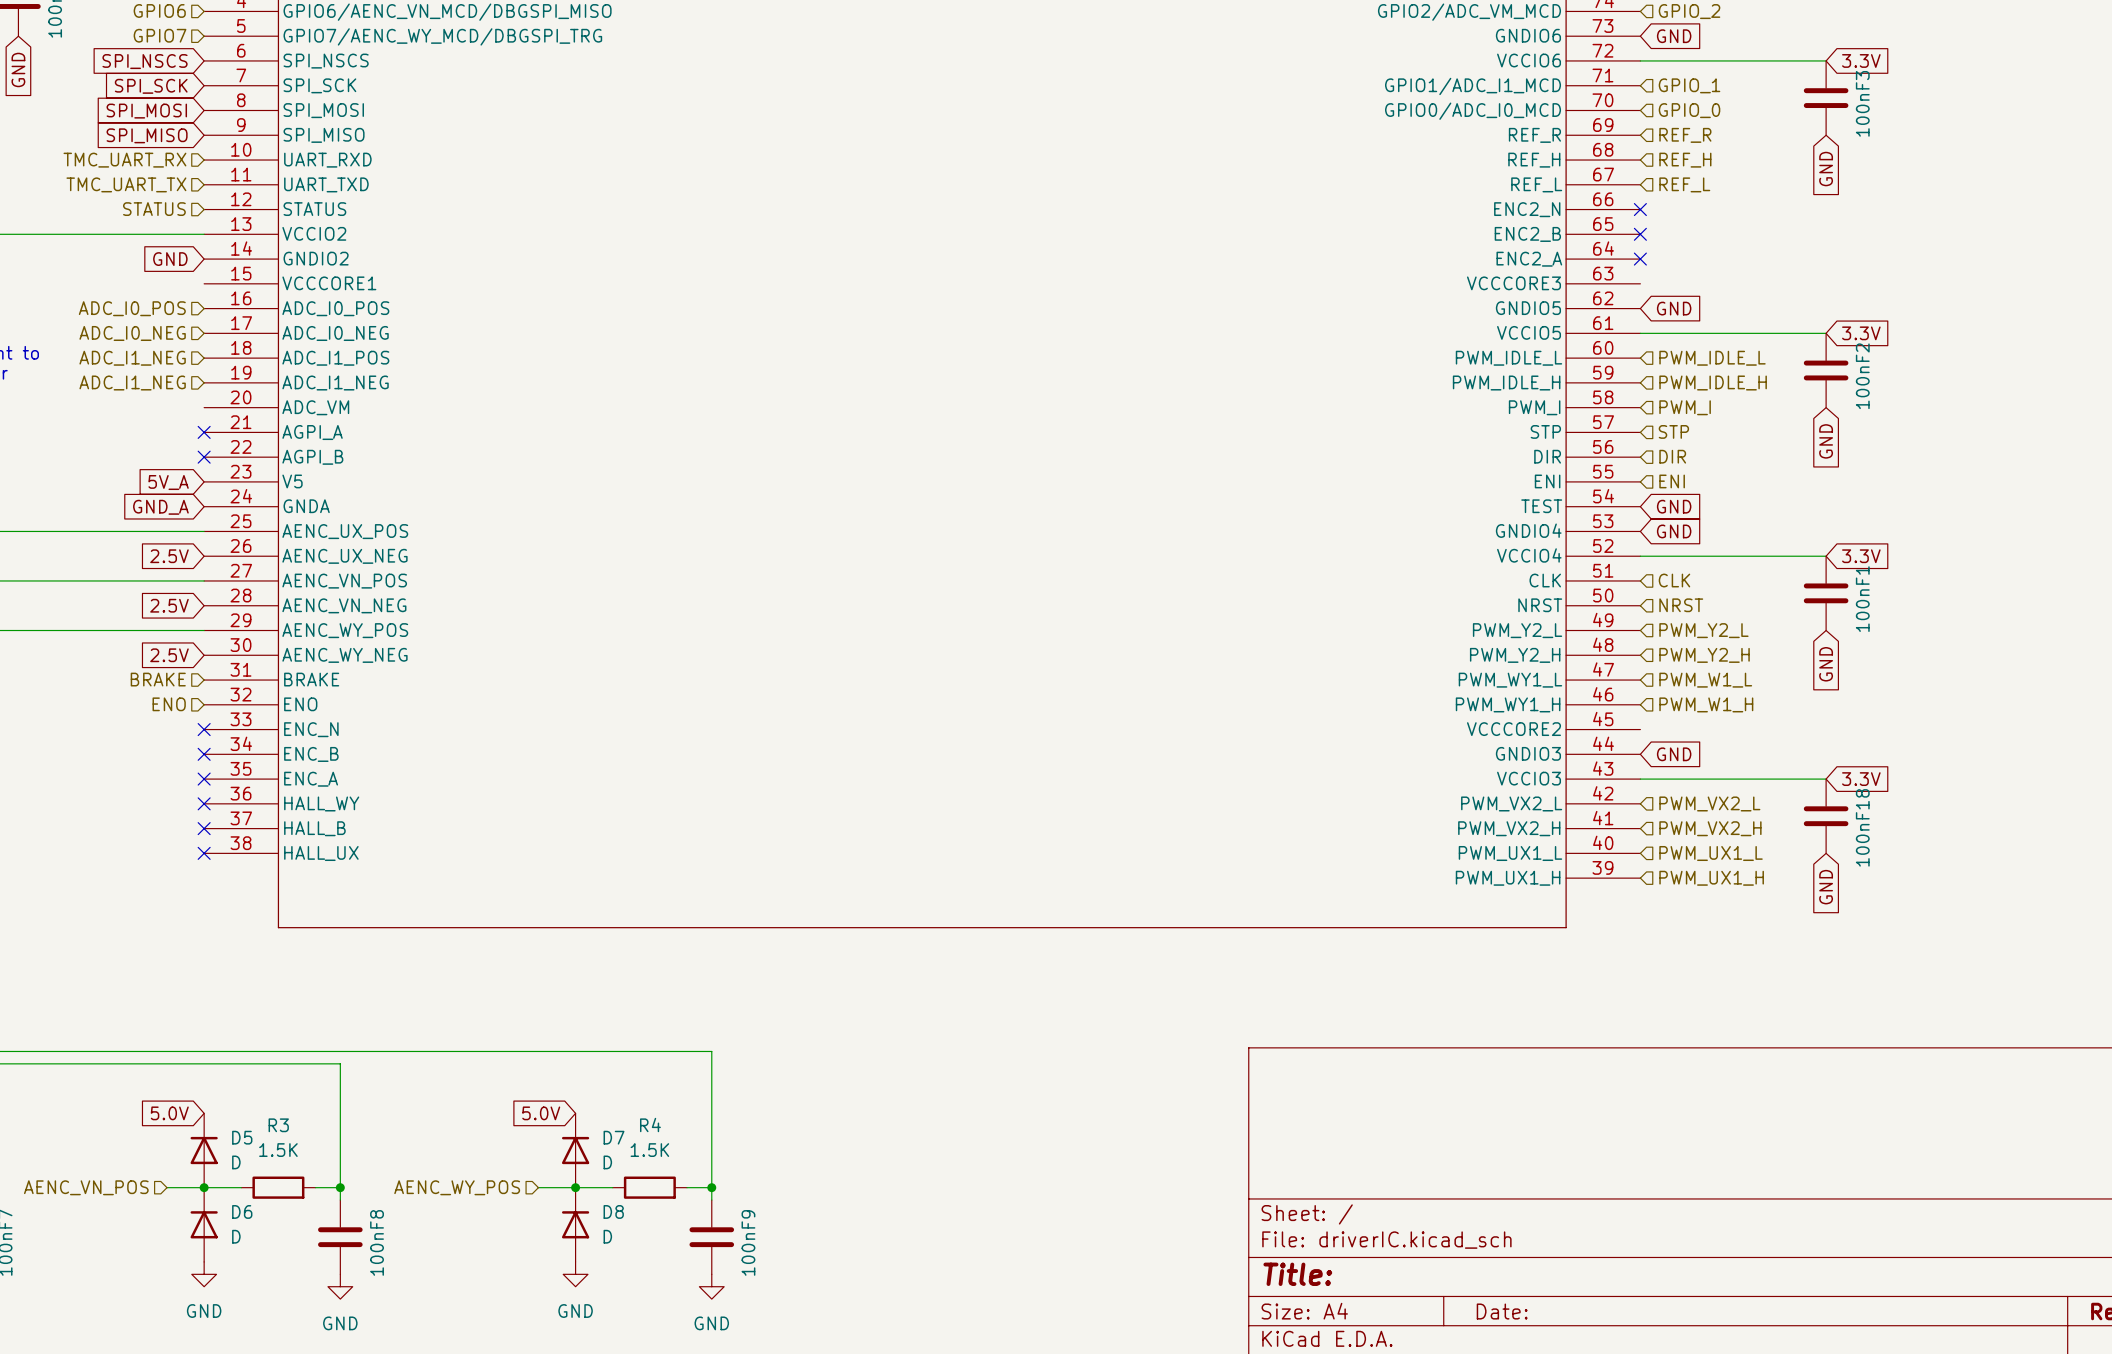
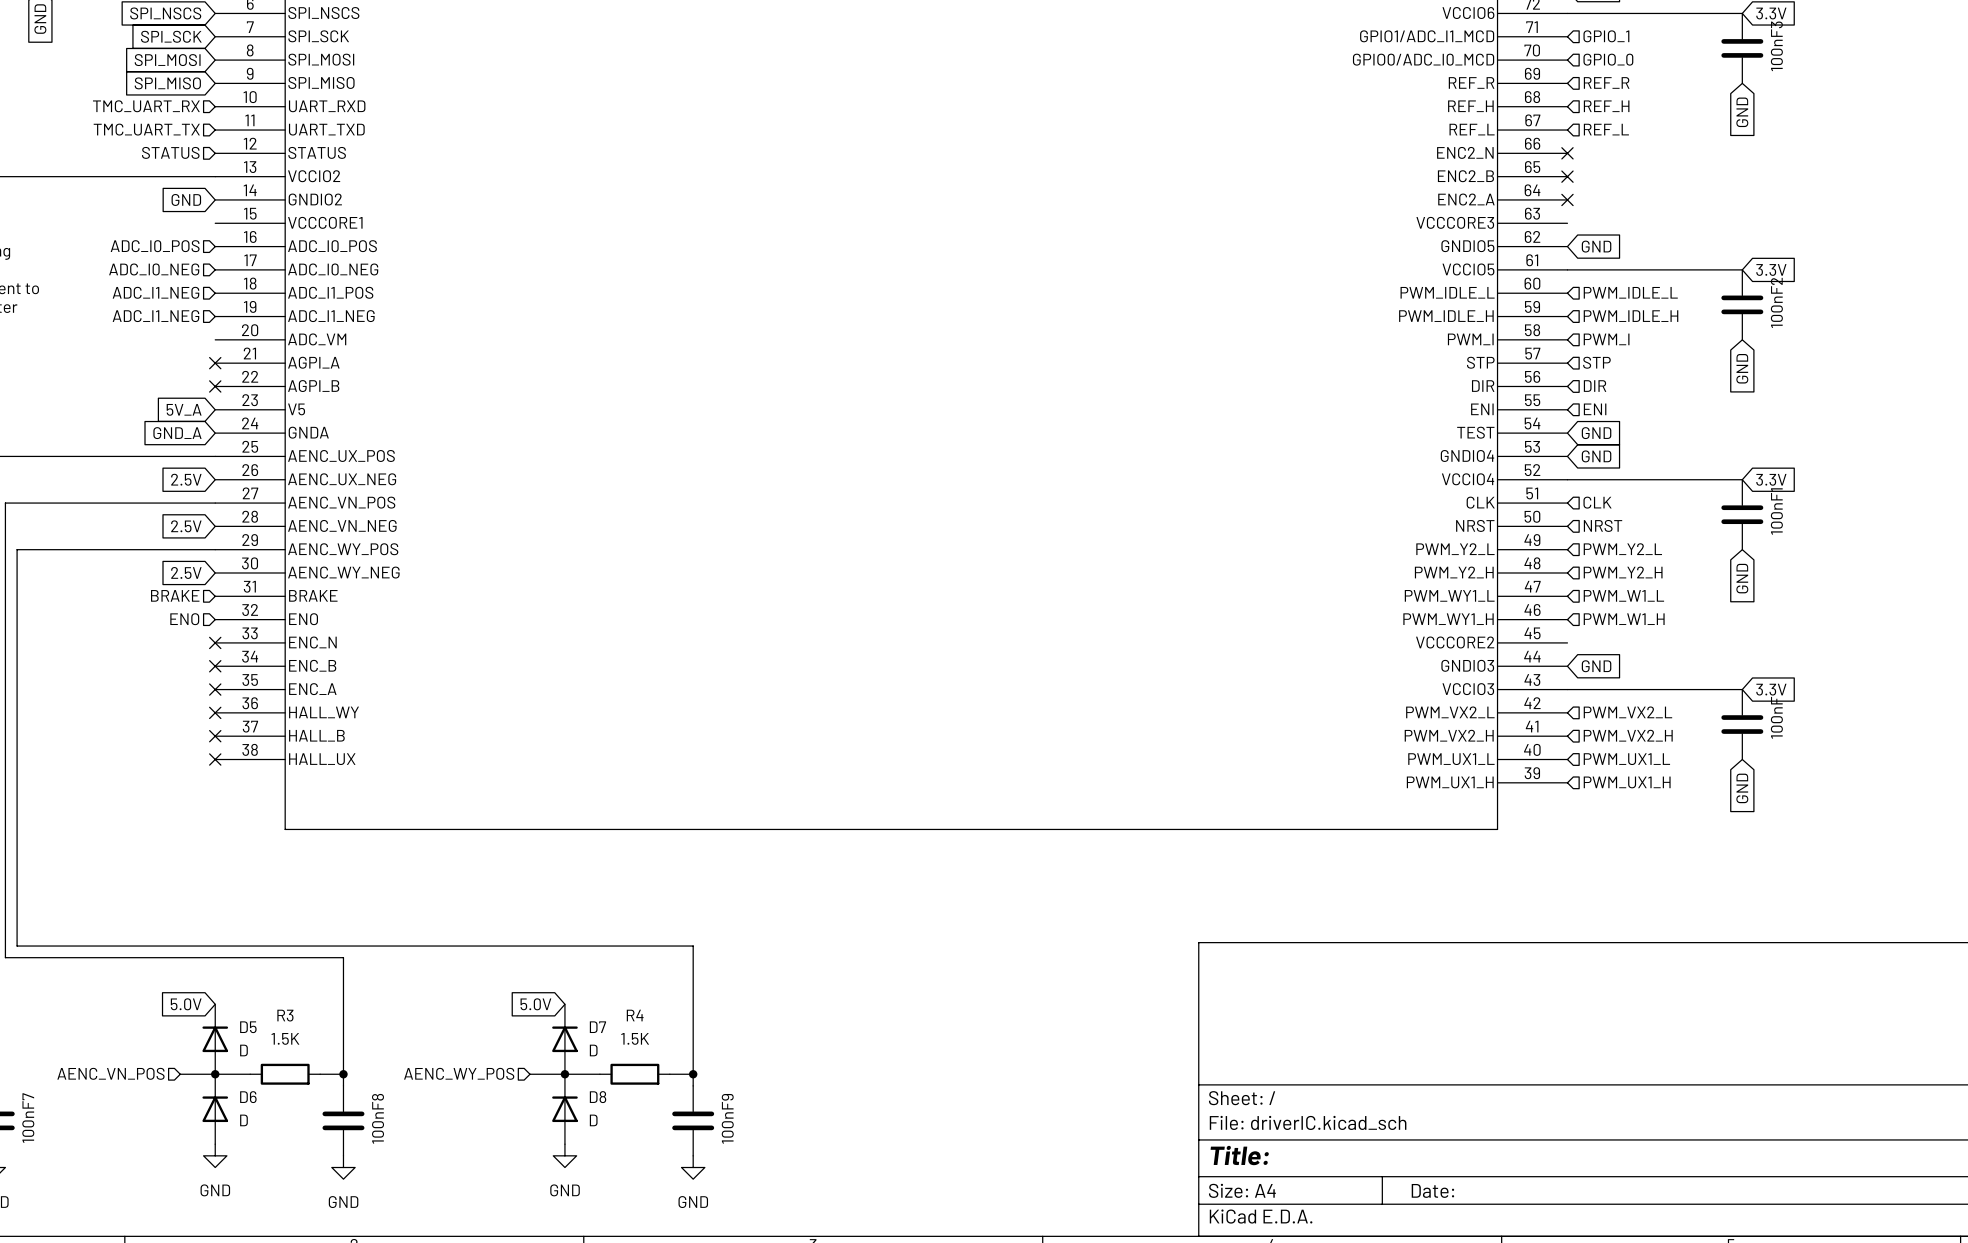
100nF18 name: 100nF18 (1862, 827) -> 100nF (1776, 717)

